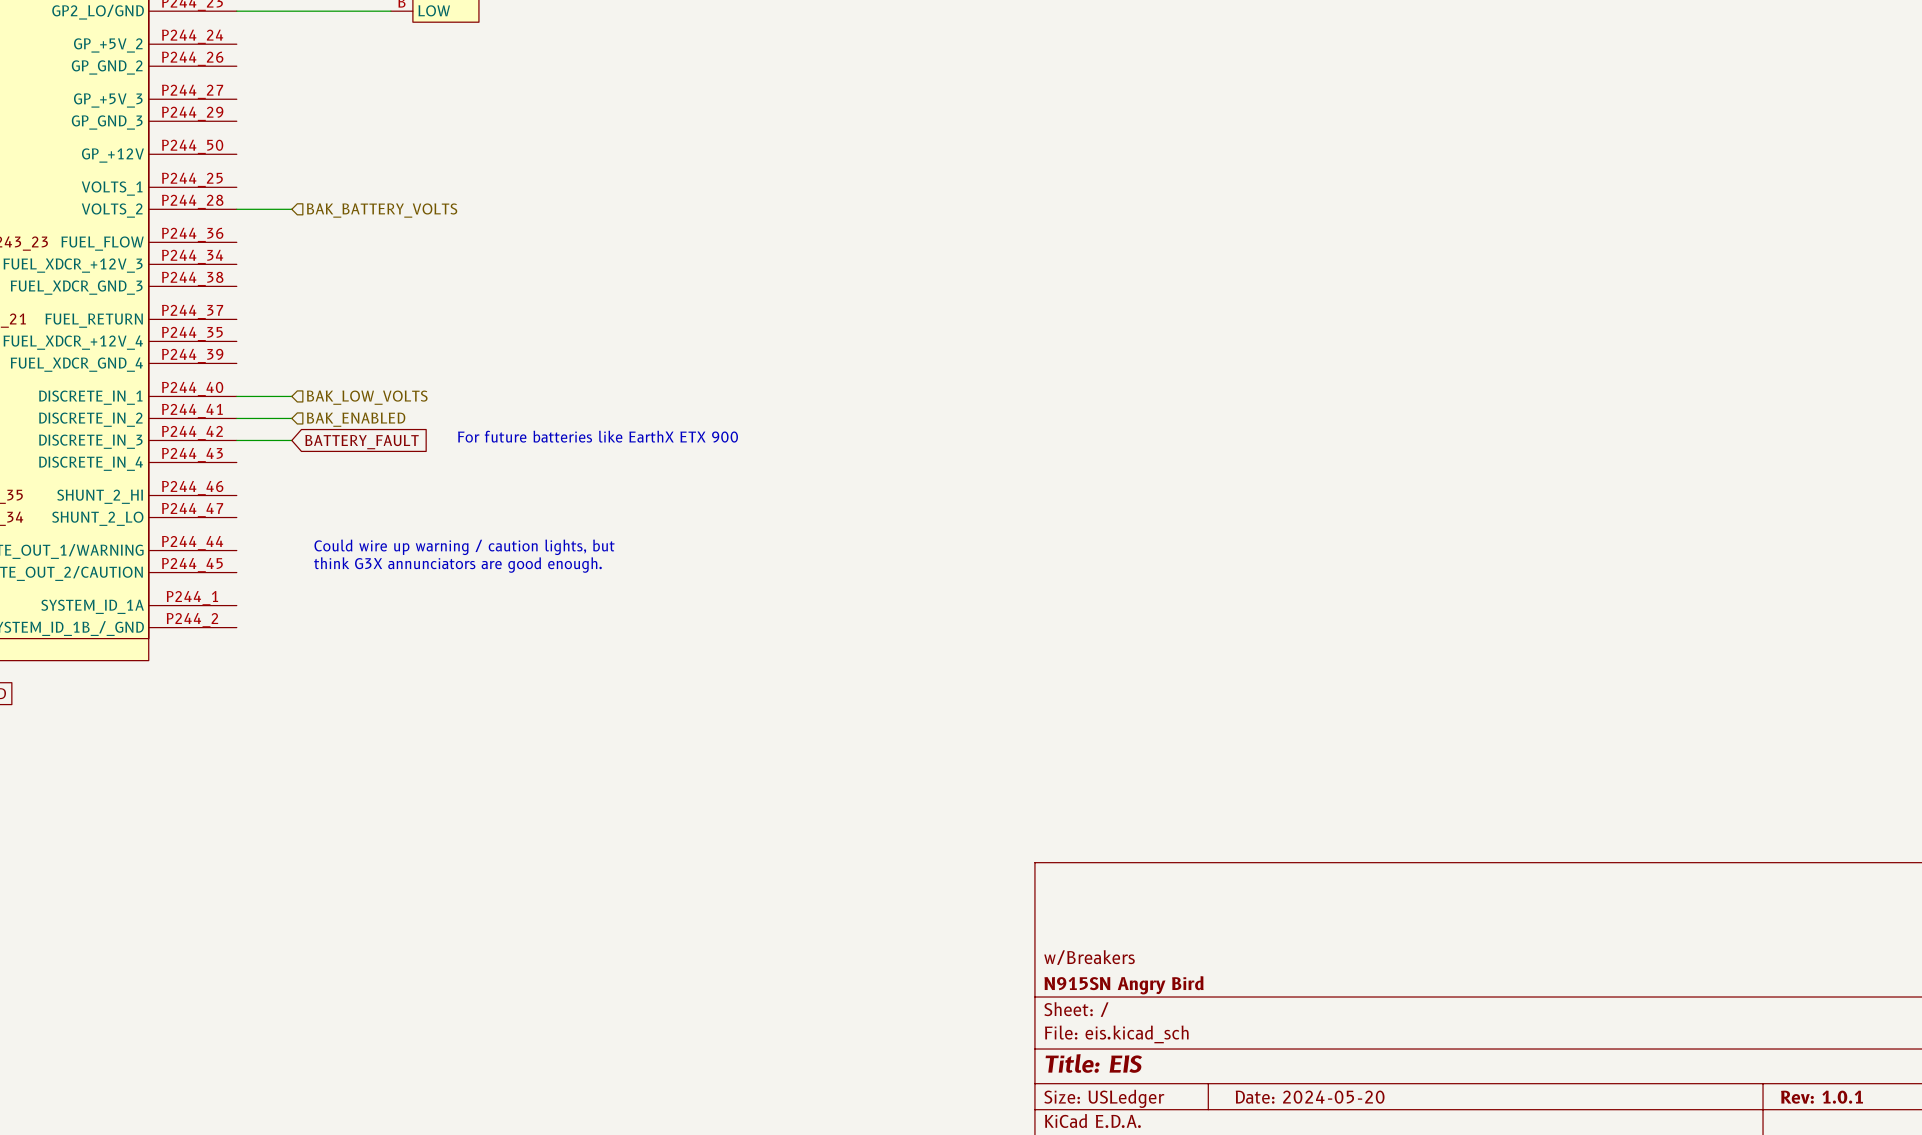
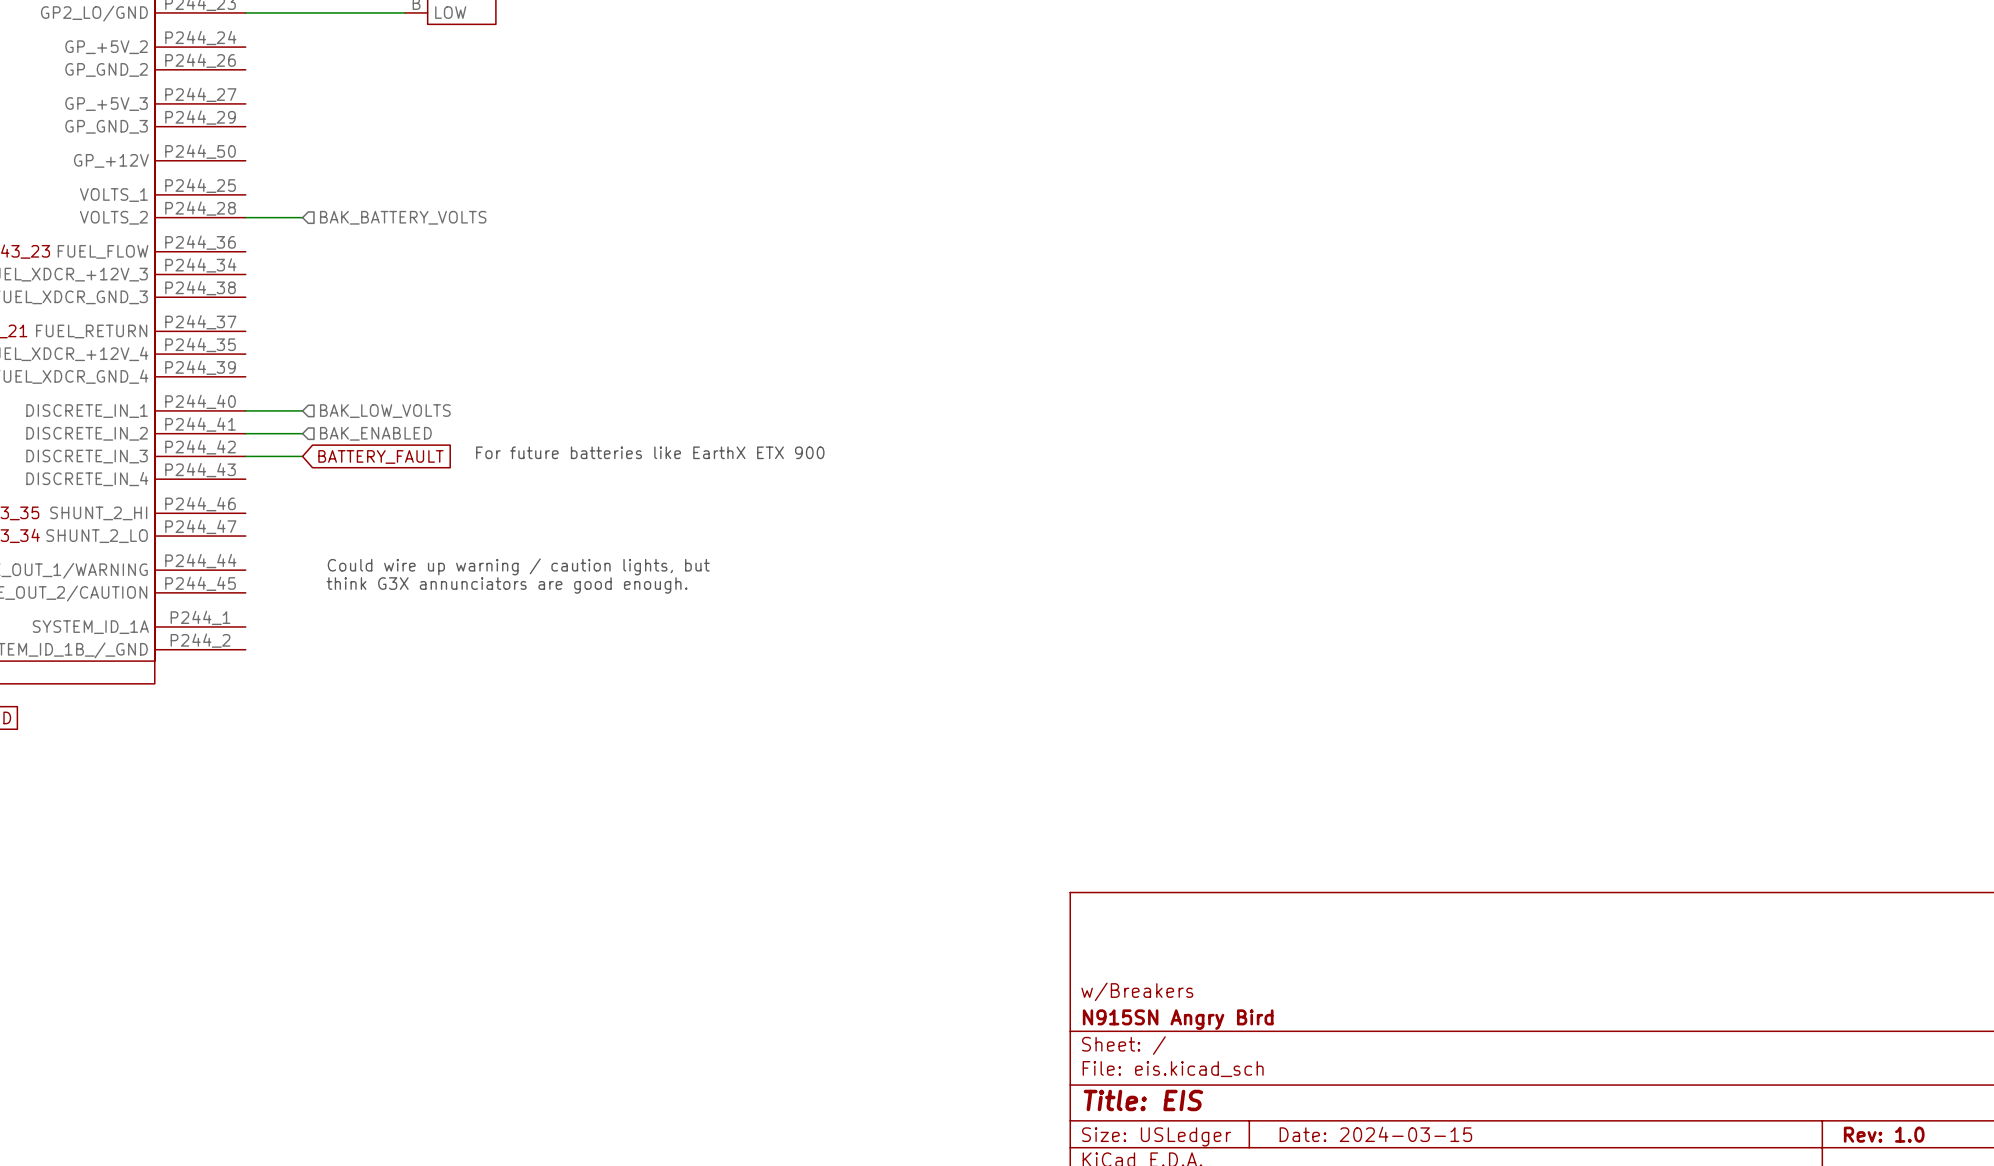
title block: Date: 2024-05-20 (1310, 1097) -> Date: 2024-03-15 (1375, 1134)
title block: Rev: 1.0.1 (1822, 1097) -> Rev: 1.0 (1884, 1134)

